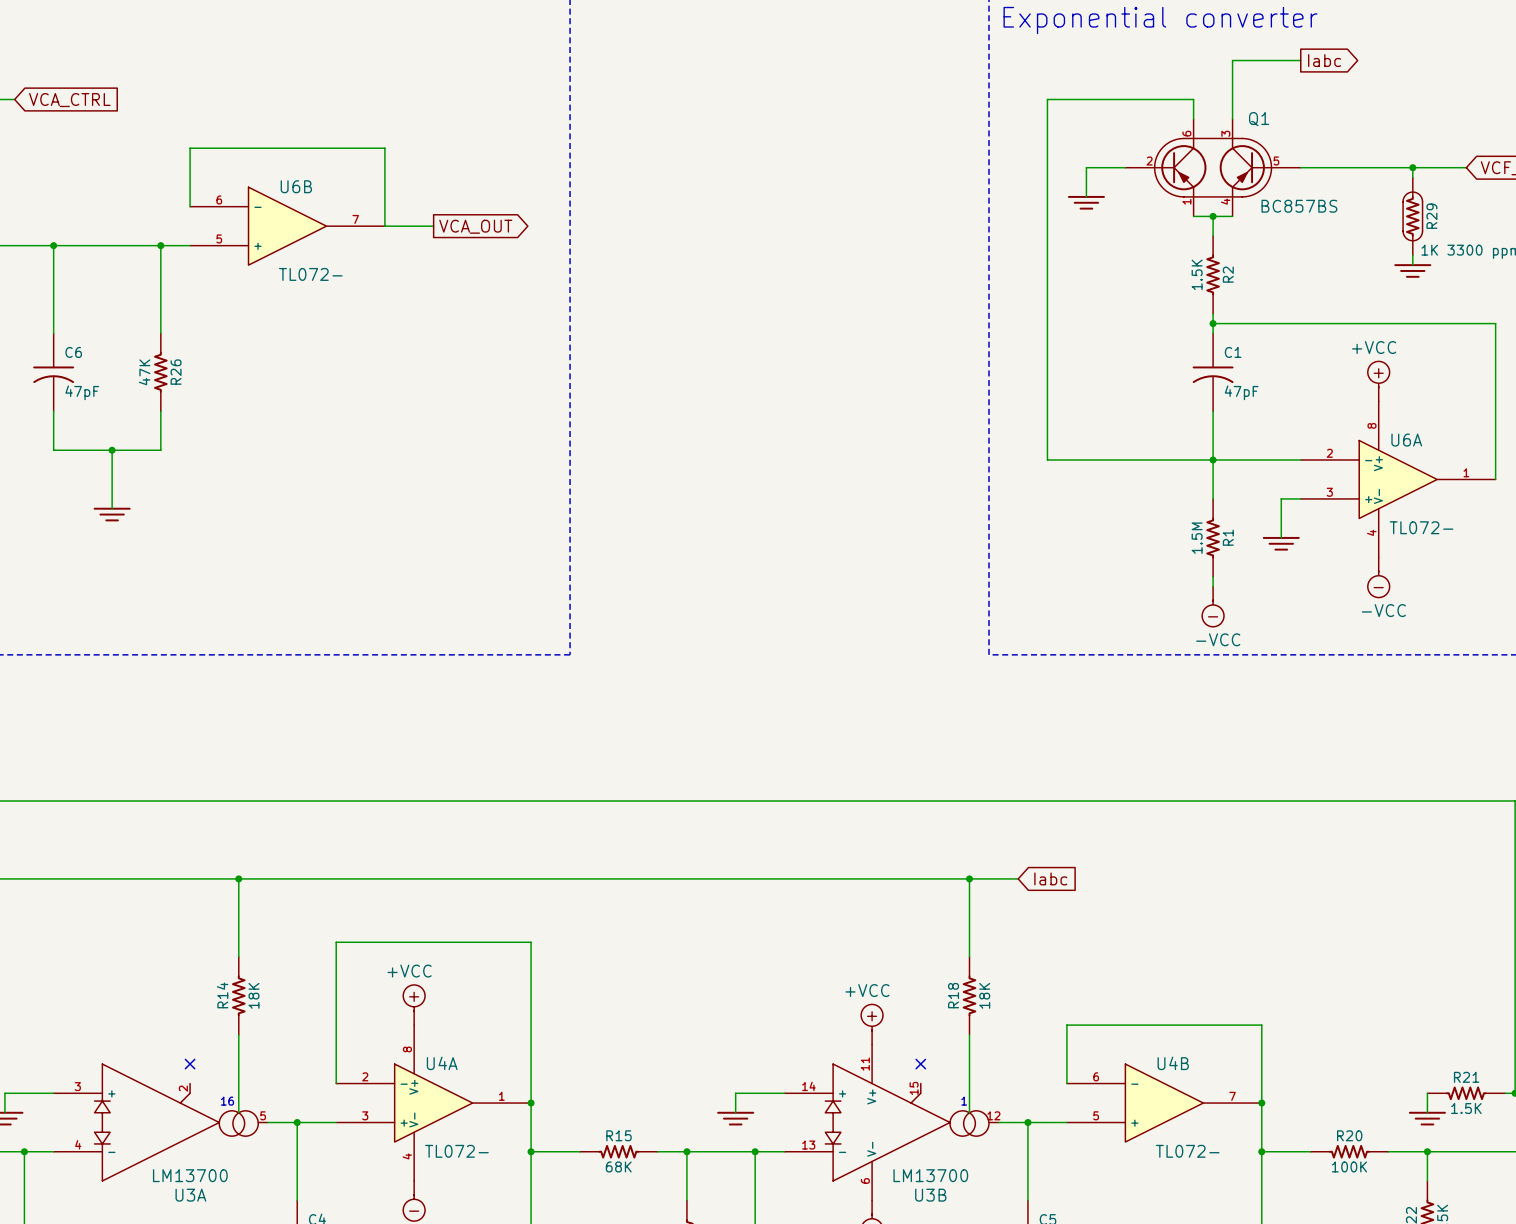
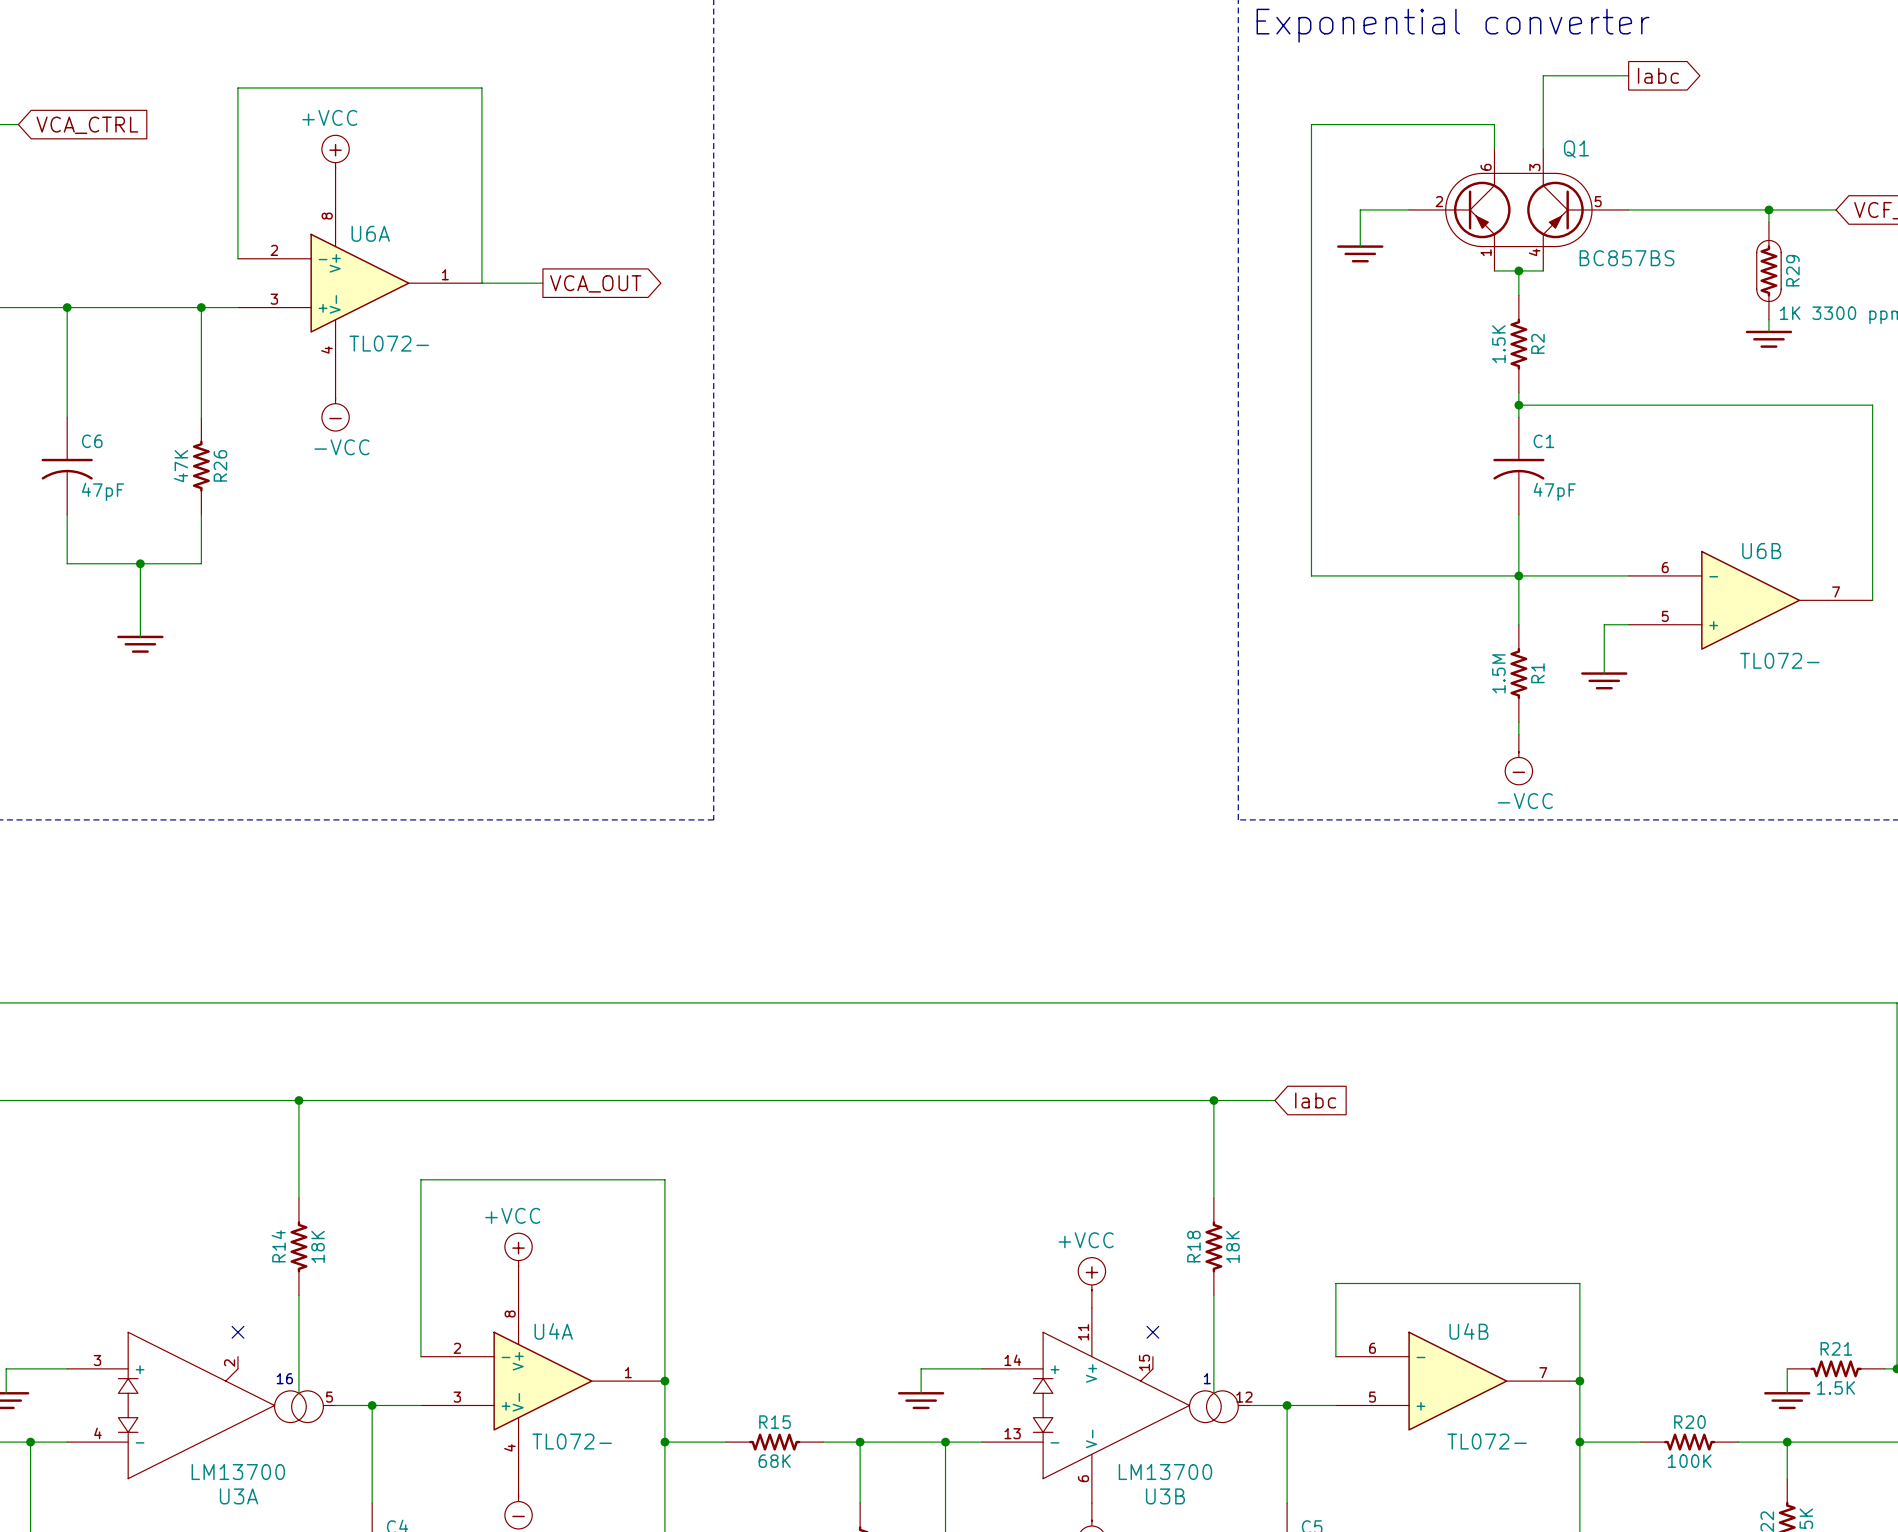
power symbol: none -> +VCC (335, 160)
wire: (190, 148) (384, 148) -> (237, 185) (237, 87) (481, 87) (481, 185)
U6B position: (287, 226) -> (1750, 600)
power symbol: none -> -VCC (335, 405)
power symbol: +VCC (1378, 381) -> none
U6A position: (1398, 479) -> (359, 283)
power symbol: -VCC (1378, 577) -> none

